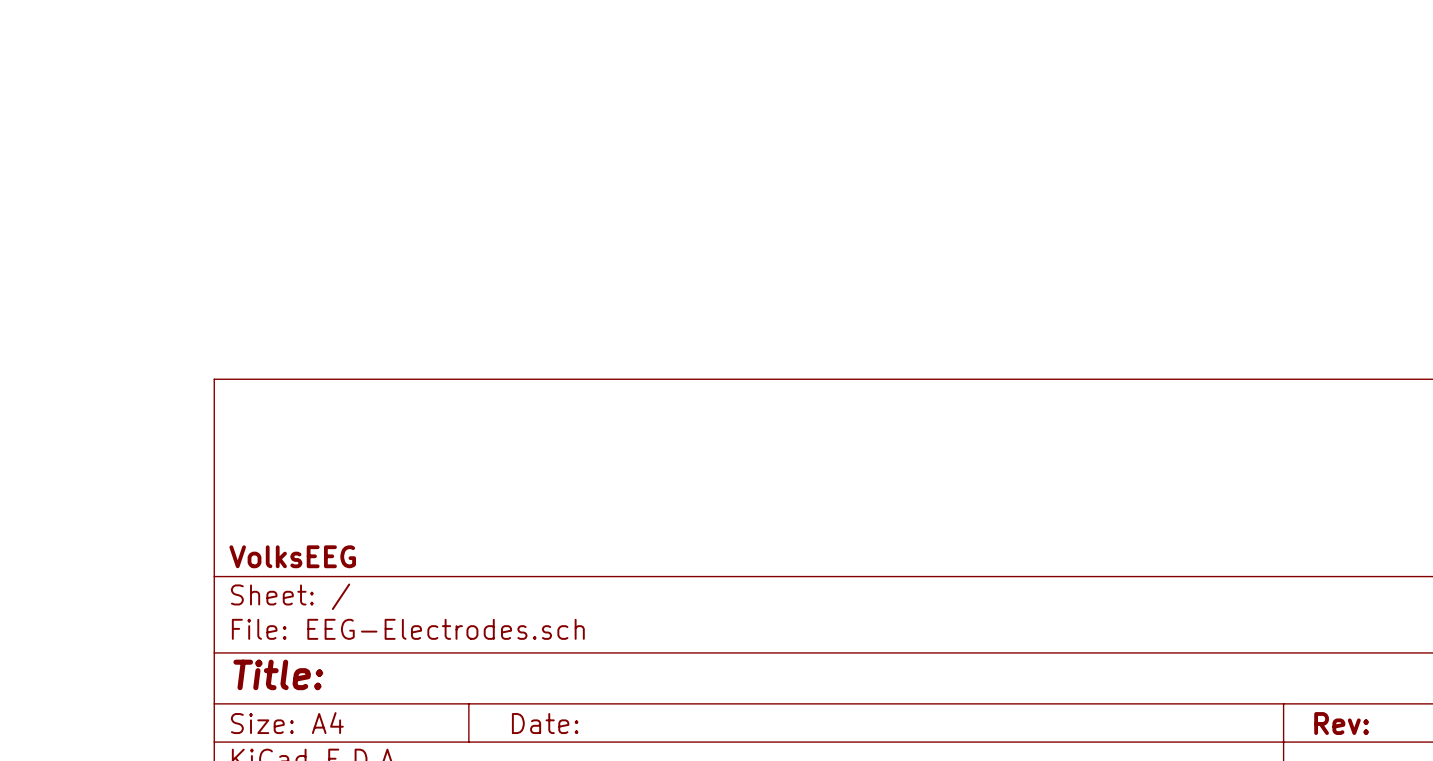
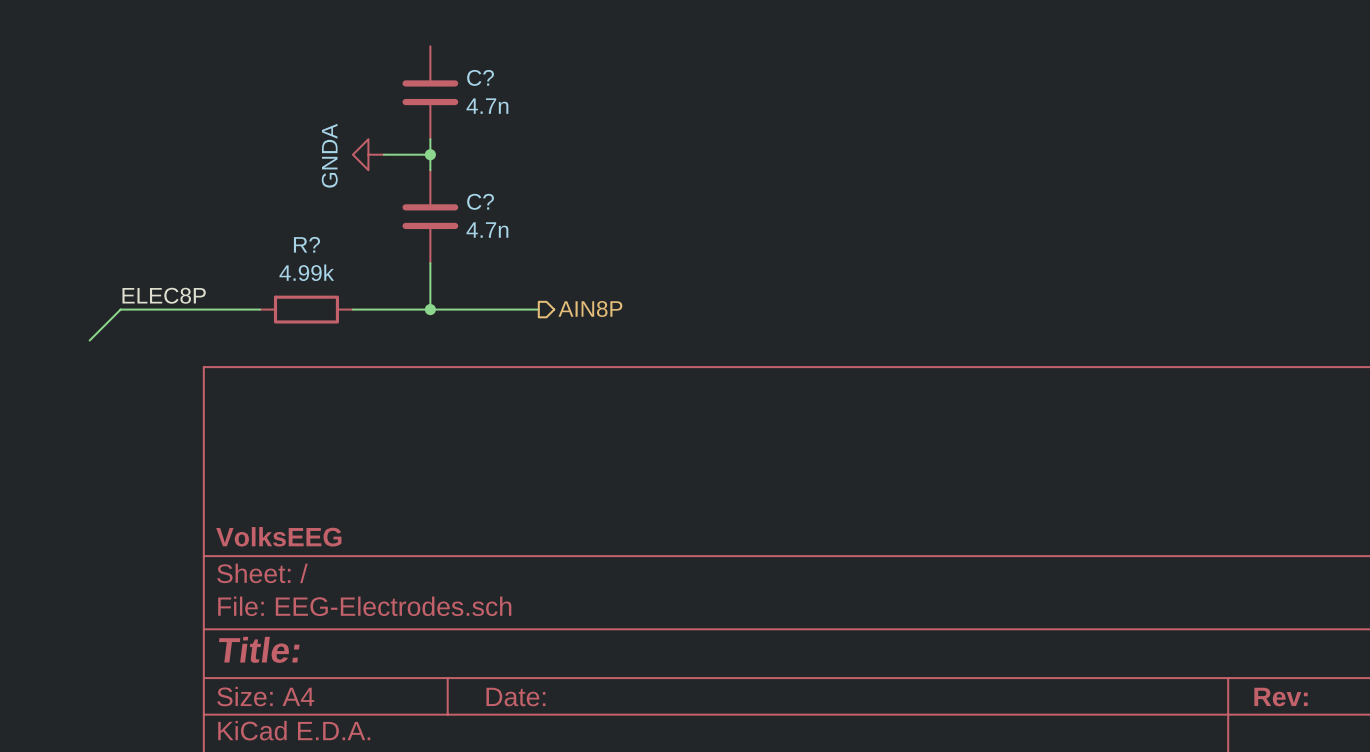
C?: none -> 4.7n (430, 92)
wire: none -> (430, 139) (430, 170)
power symbol: none -> GNDA (368, 154)
wire: none -> (383, 154) (430, 154)
junction: none -> (430, 154)
C?: none -> 4.7n (430, 216)
wire: none -> (430, 263) (430, 309)
label: none -> ELEC8P (164, 295)
hierarchical label: none -> AIN8P (590, 308)
wire: none -> (260, 309) (120, 309) (89, 340)
R?: none -> 4.99k (306, 309)
wire: none -> (352, 309) (538, 309)
junction: none -> (430, 309)

